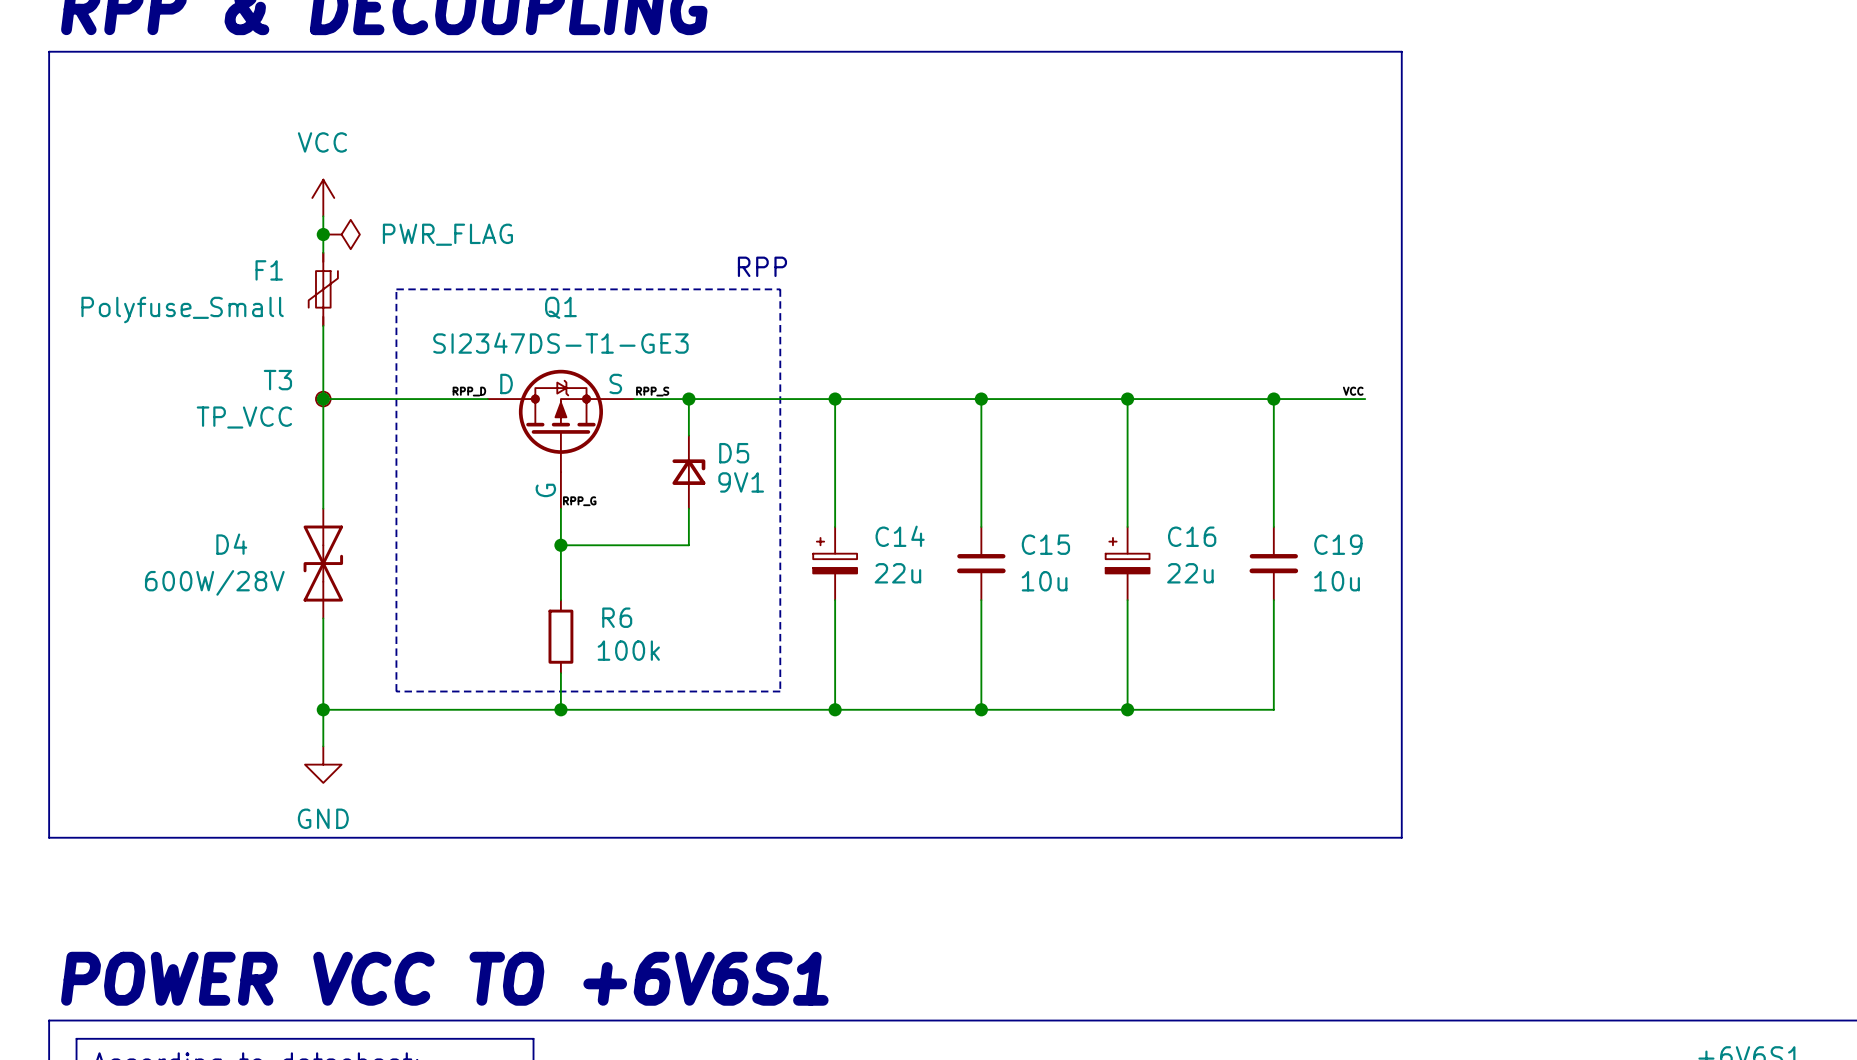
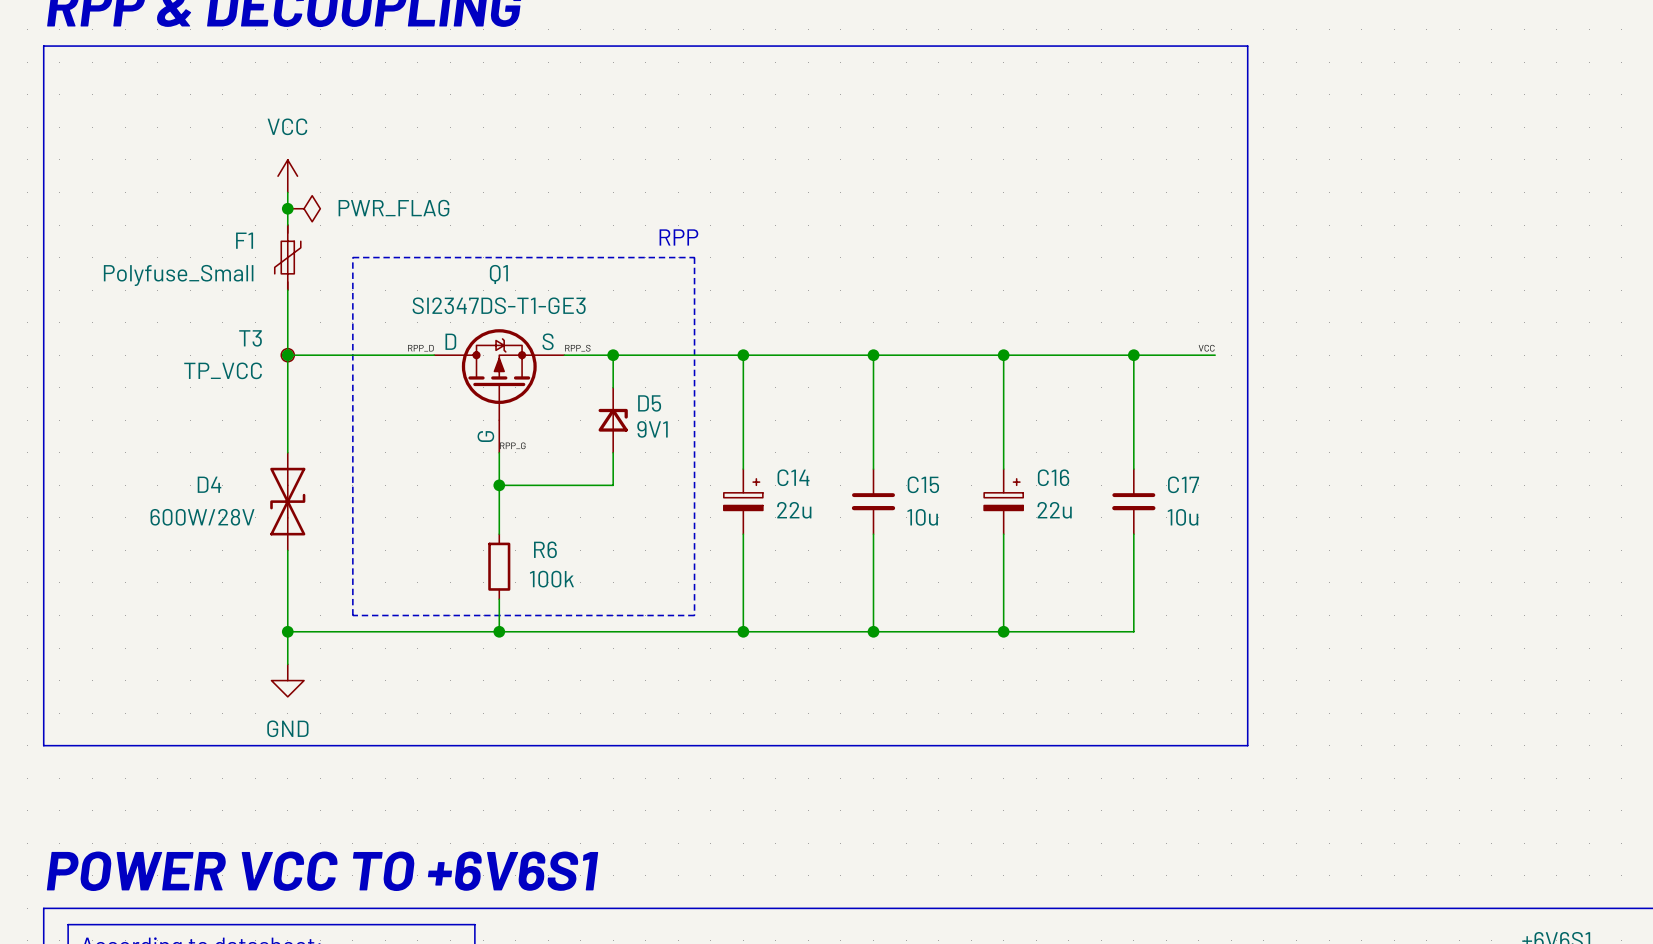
C19 name: C19 (1338, 544) -> C17 (1183, 484)
C14 flip: as is (835, 555) -> left-right (743, 494)
C16 flip: as is (1127, 555) -> left-right (1003, 494)

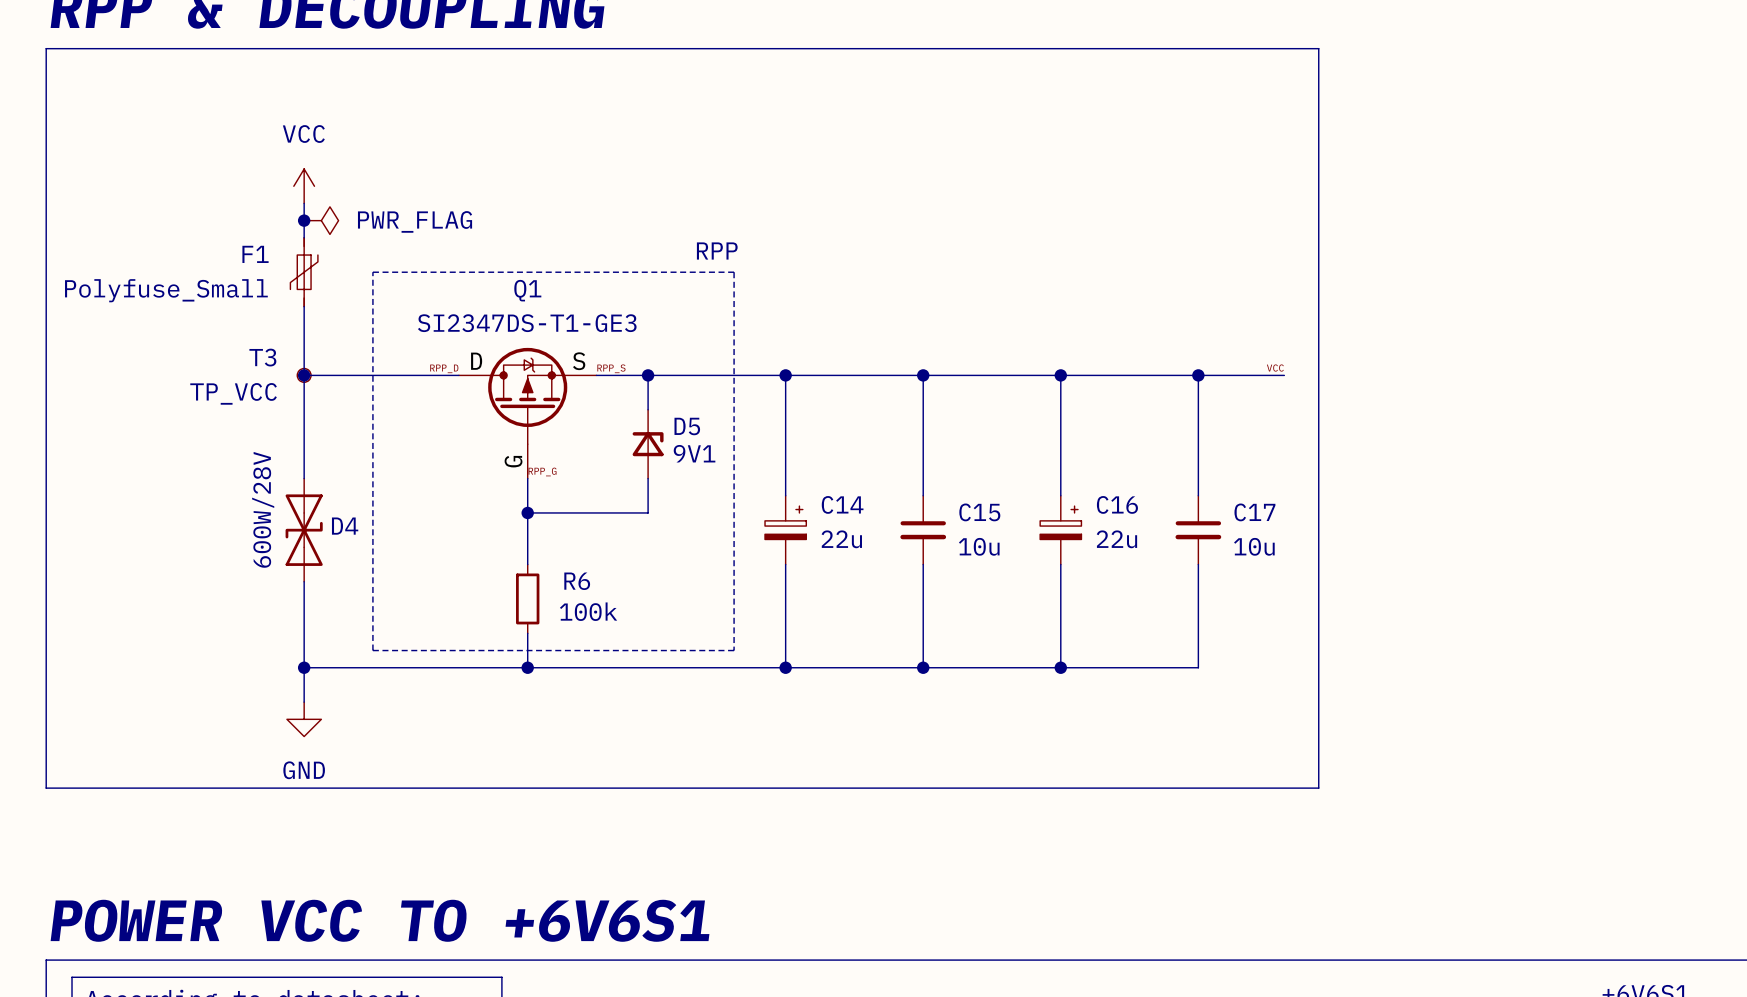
D4 name position: D4 (209, 484) -> D4 (345, 526)
D4 value rotation: 0° (202, 517) -> 90° counterclockwise (263, 509)

